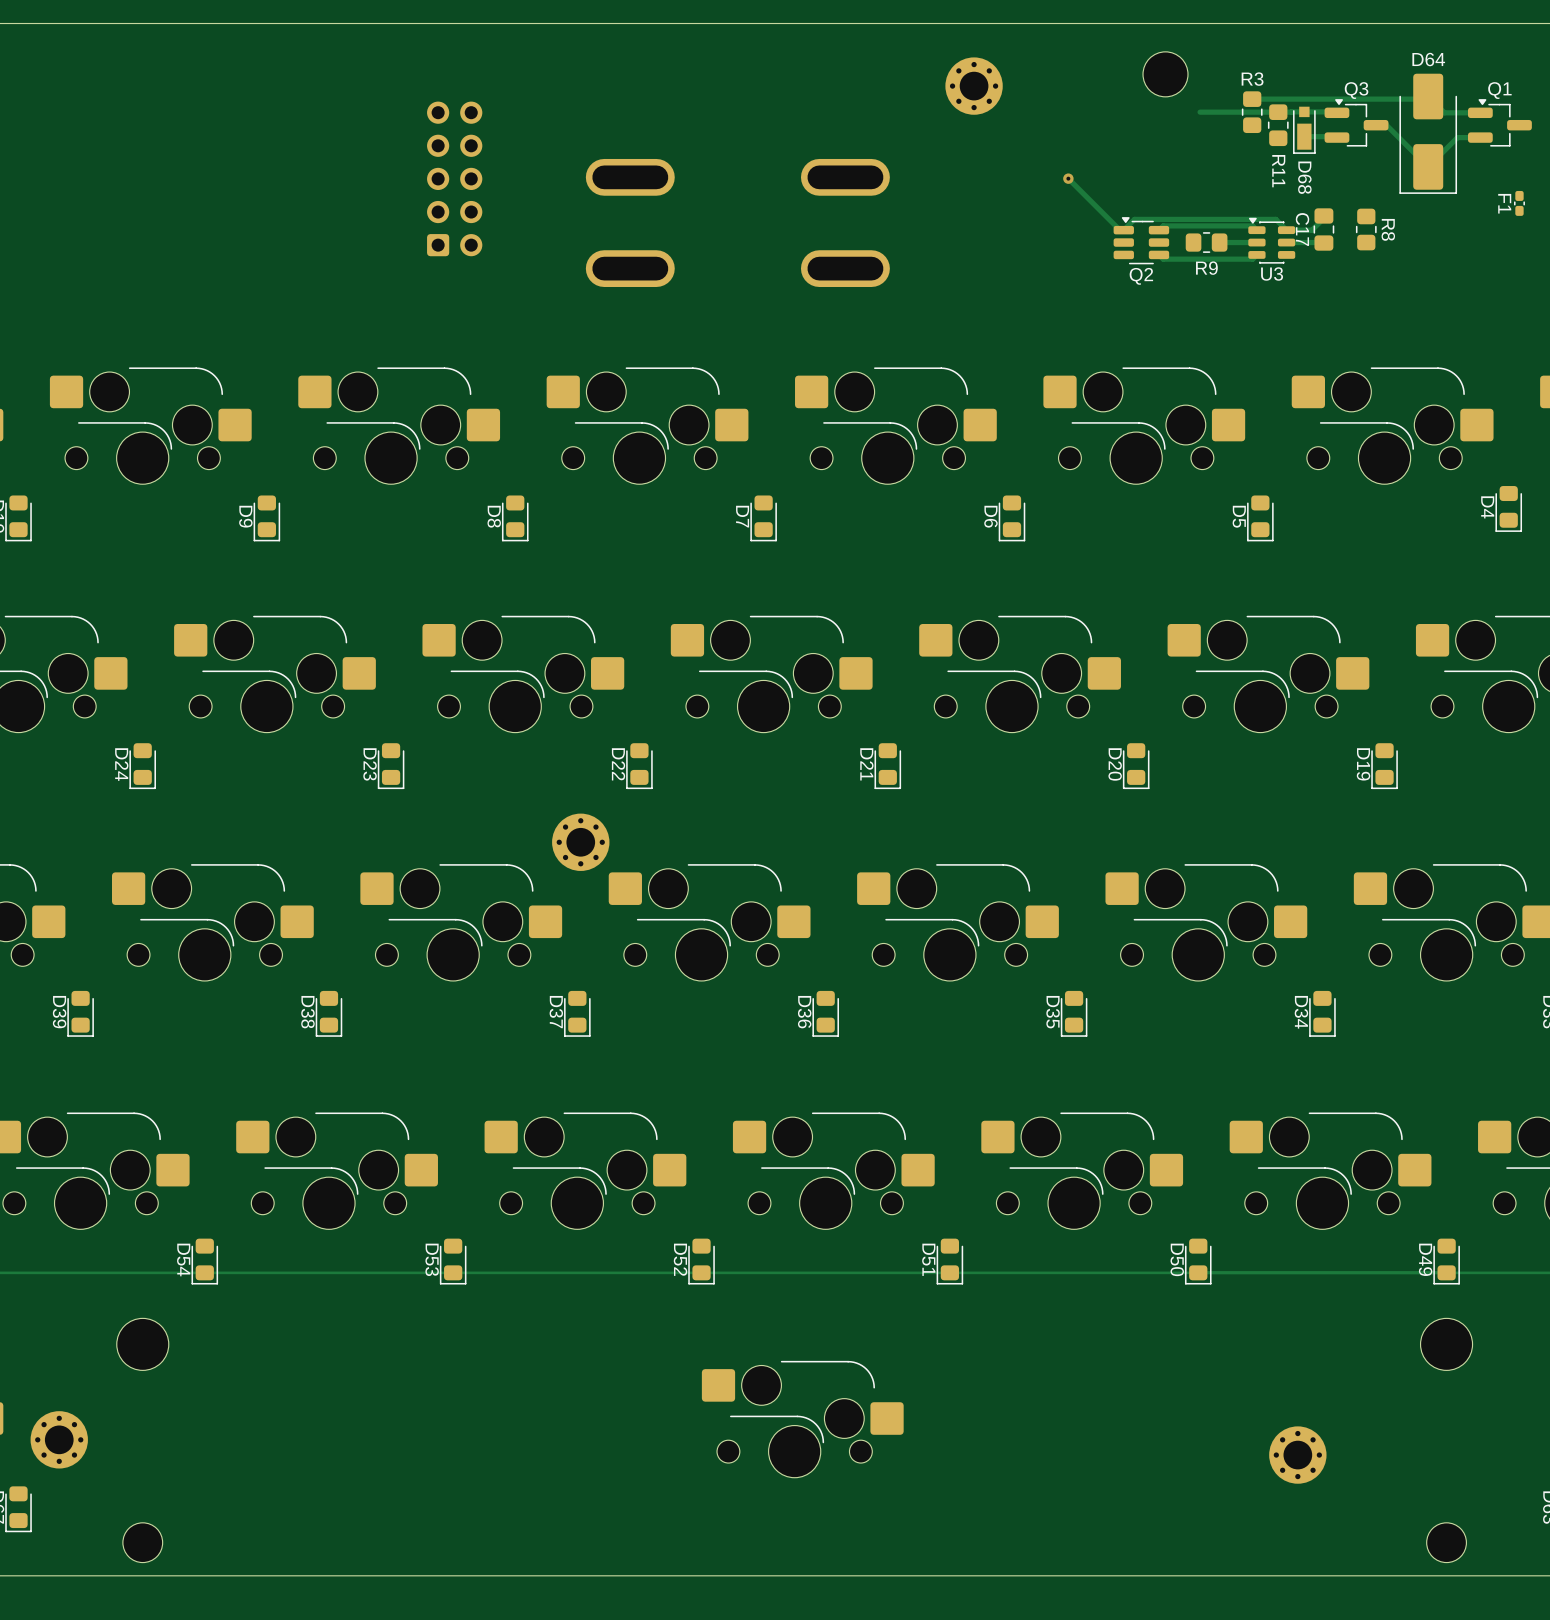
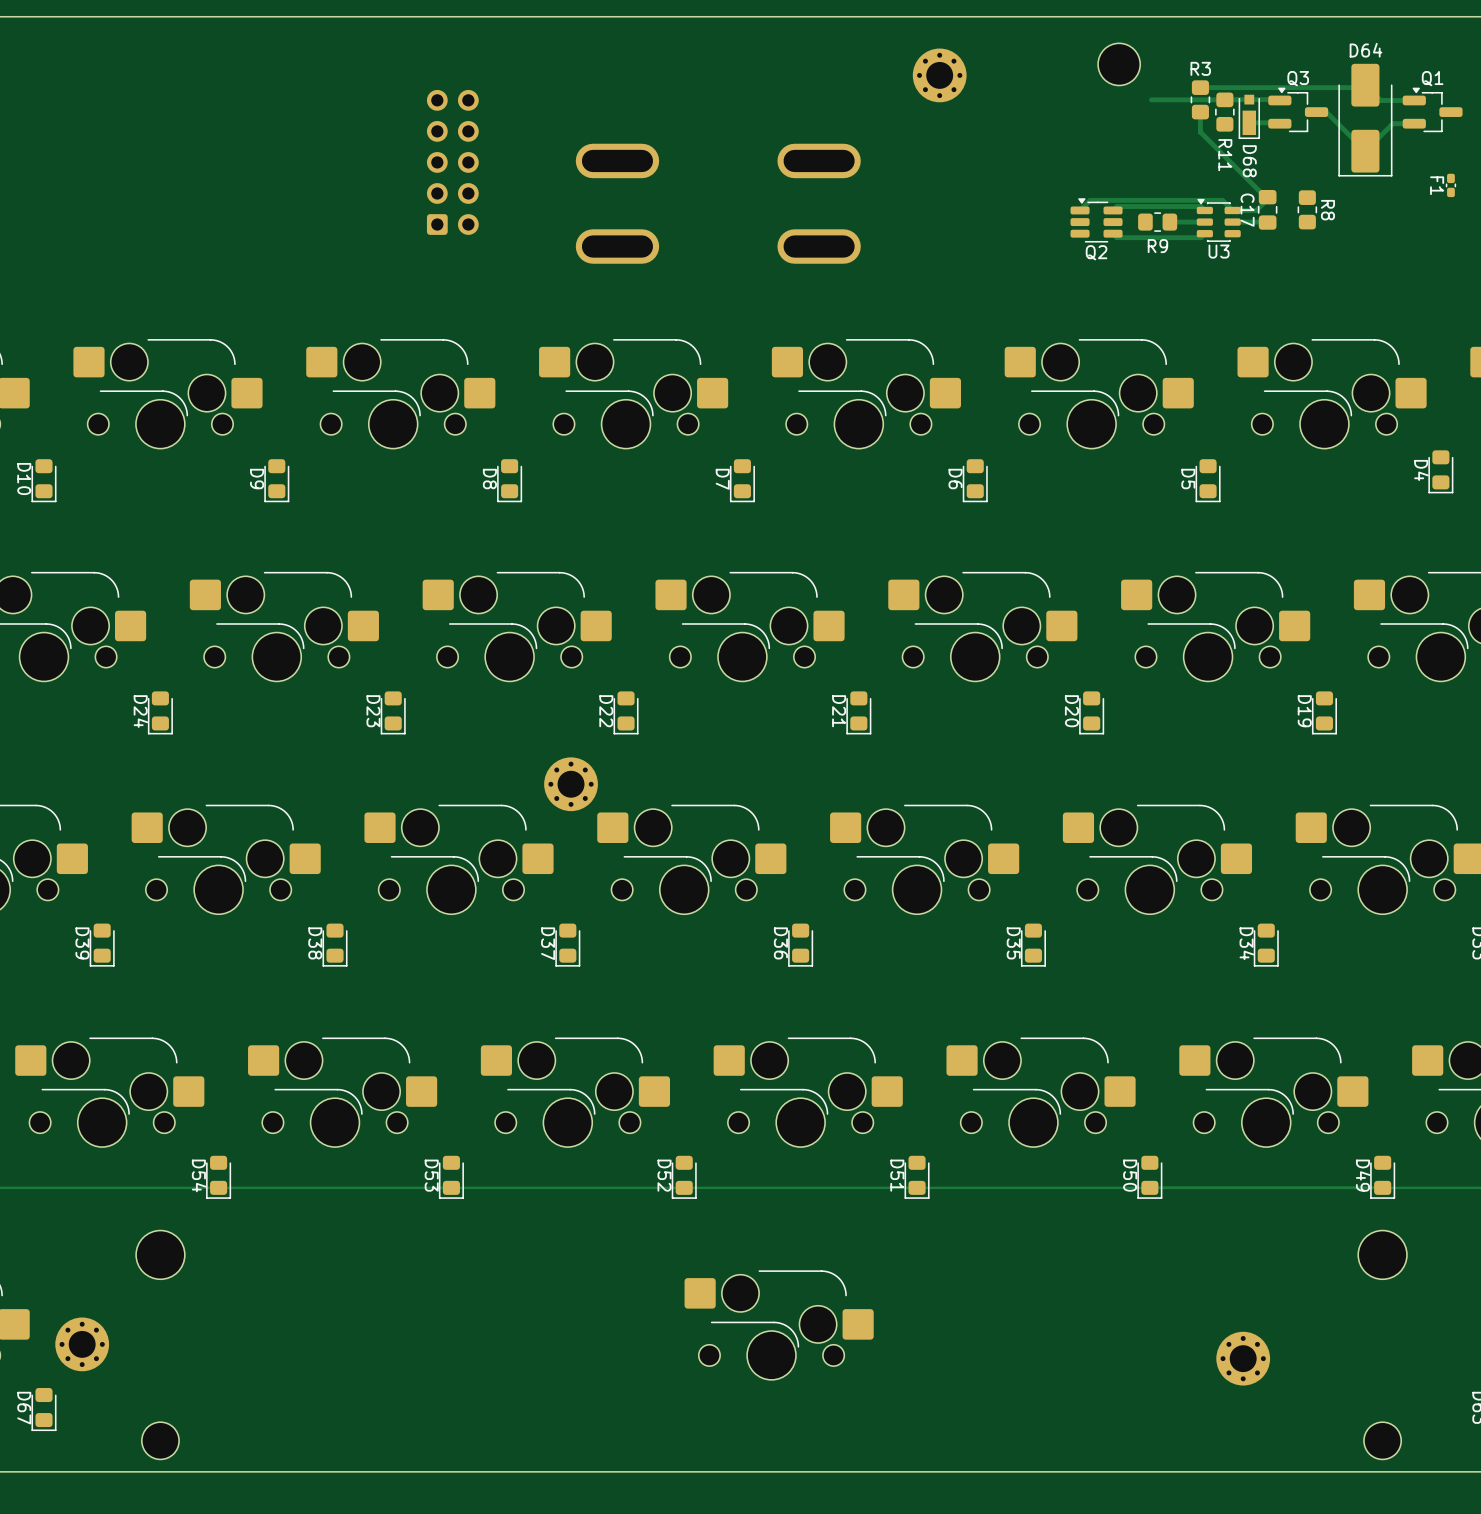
track: none -> (1200, 112) (1200, 132) (1267, 199)
track: (1069, 177) (1068, 178) (1119, 230) (1123, 230) -> none
via: (1068, 178) -> none

